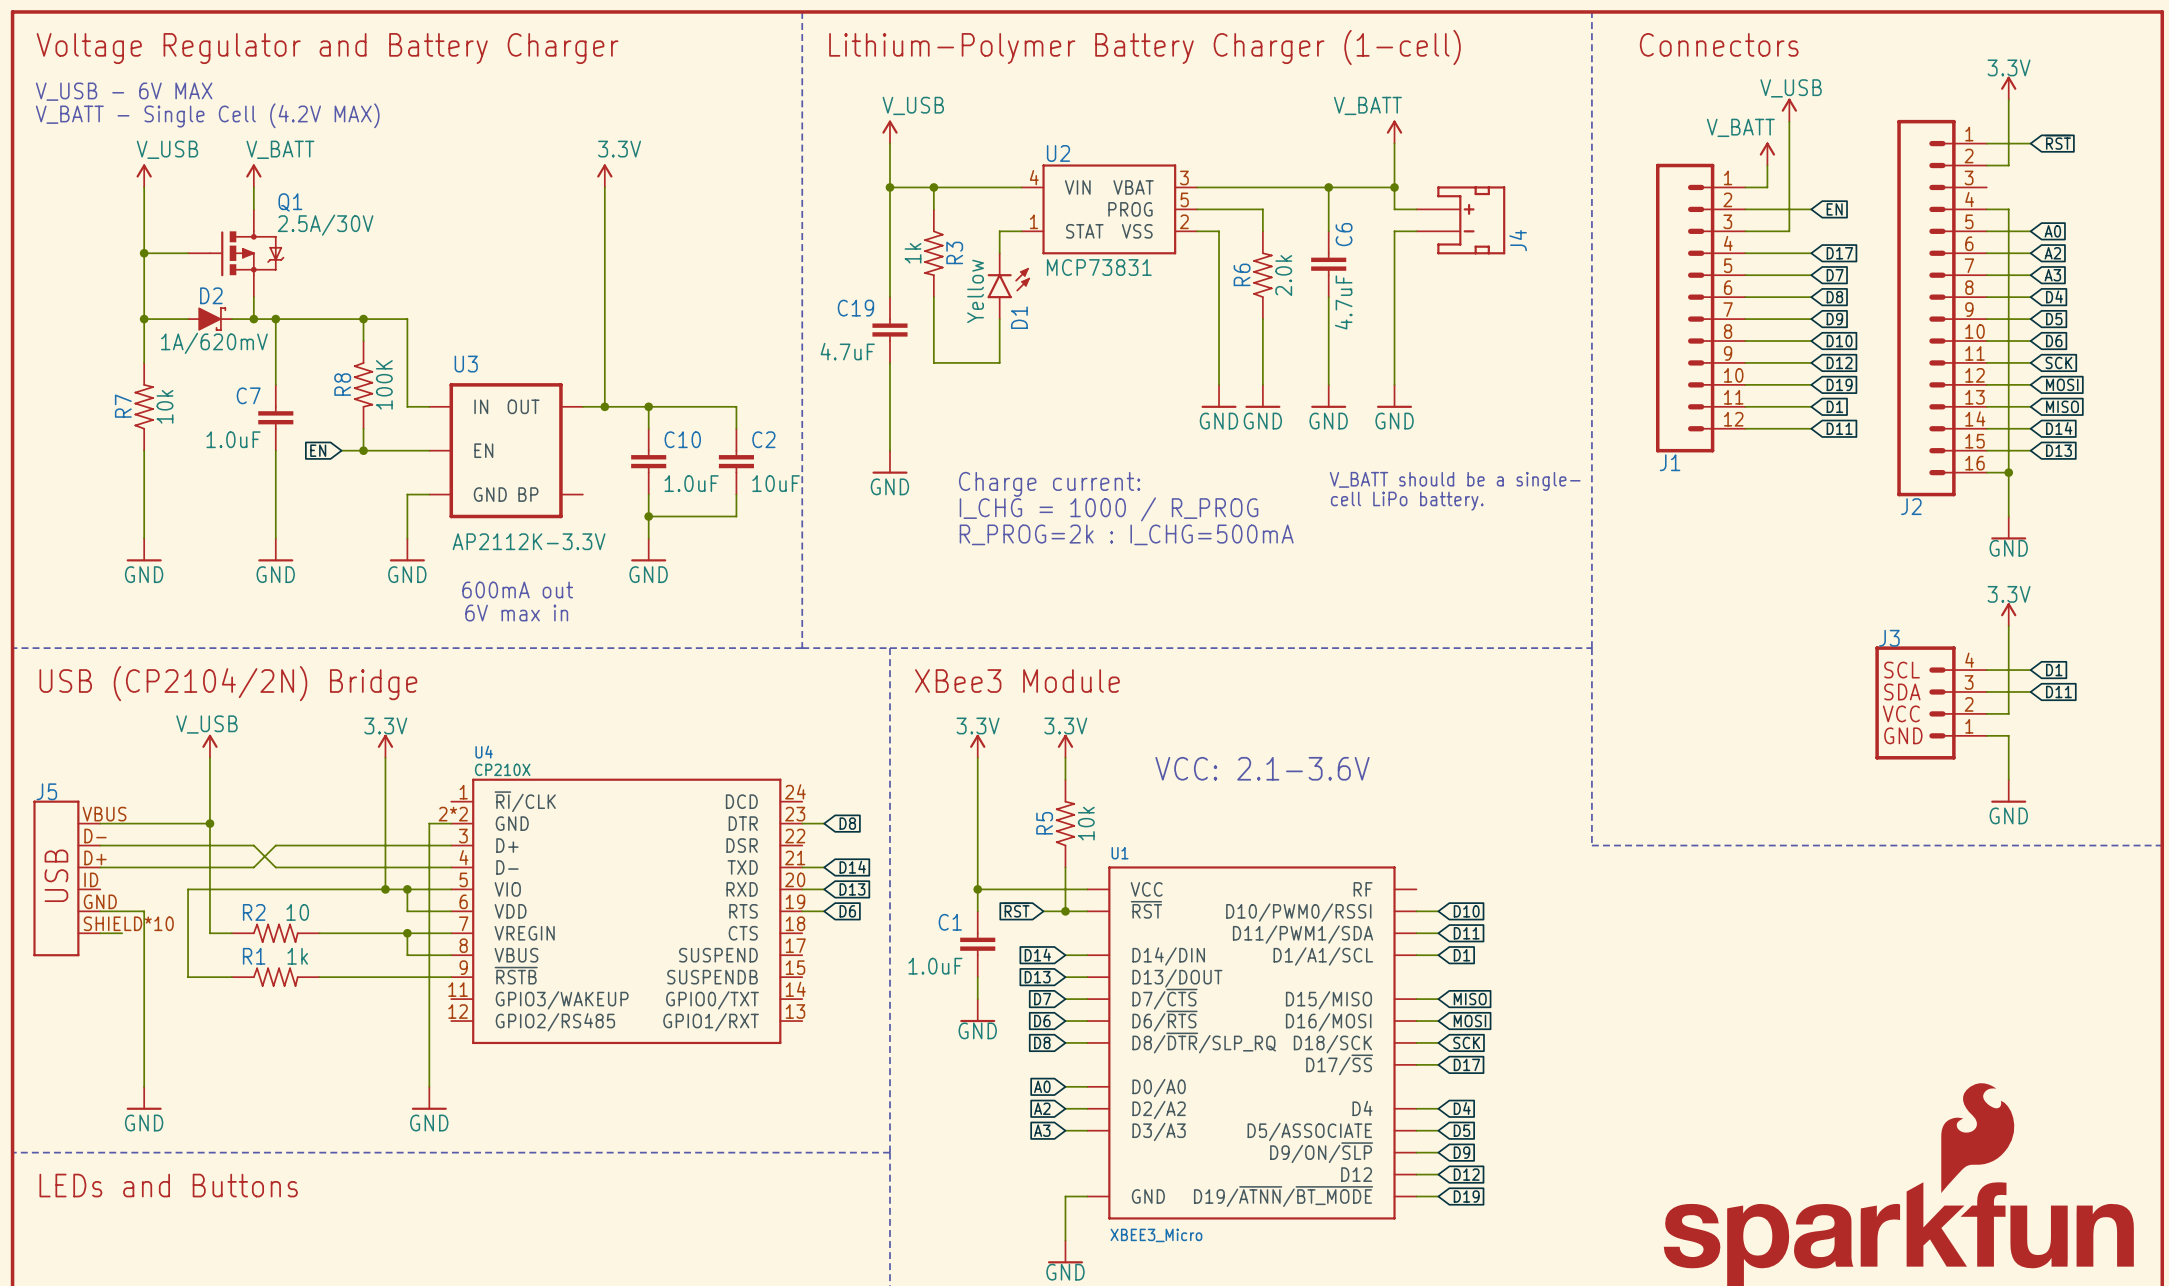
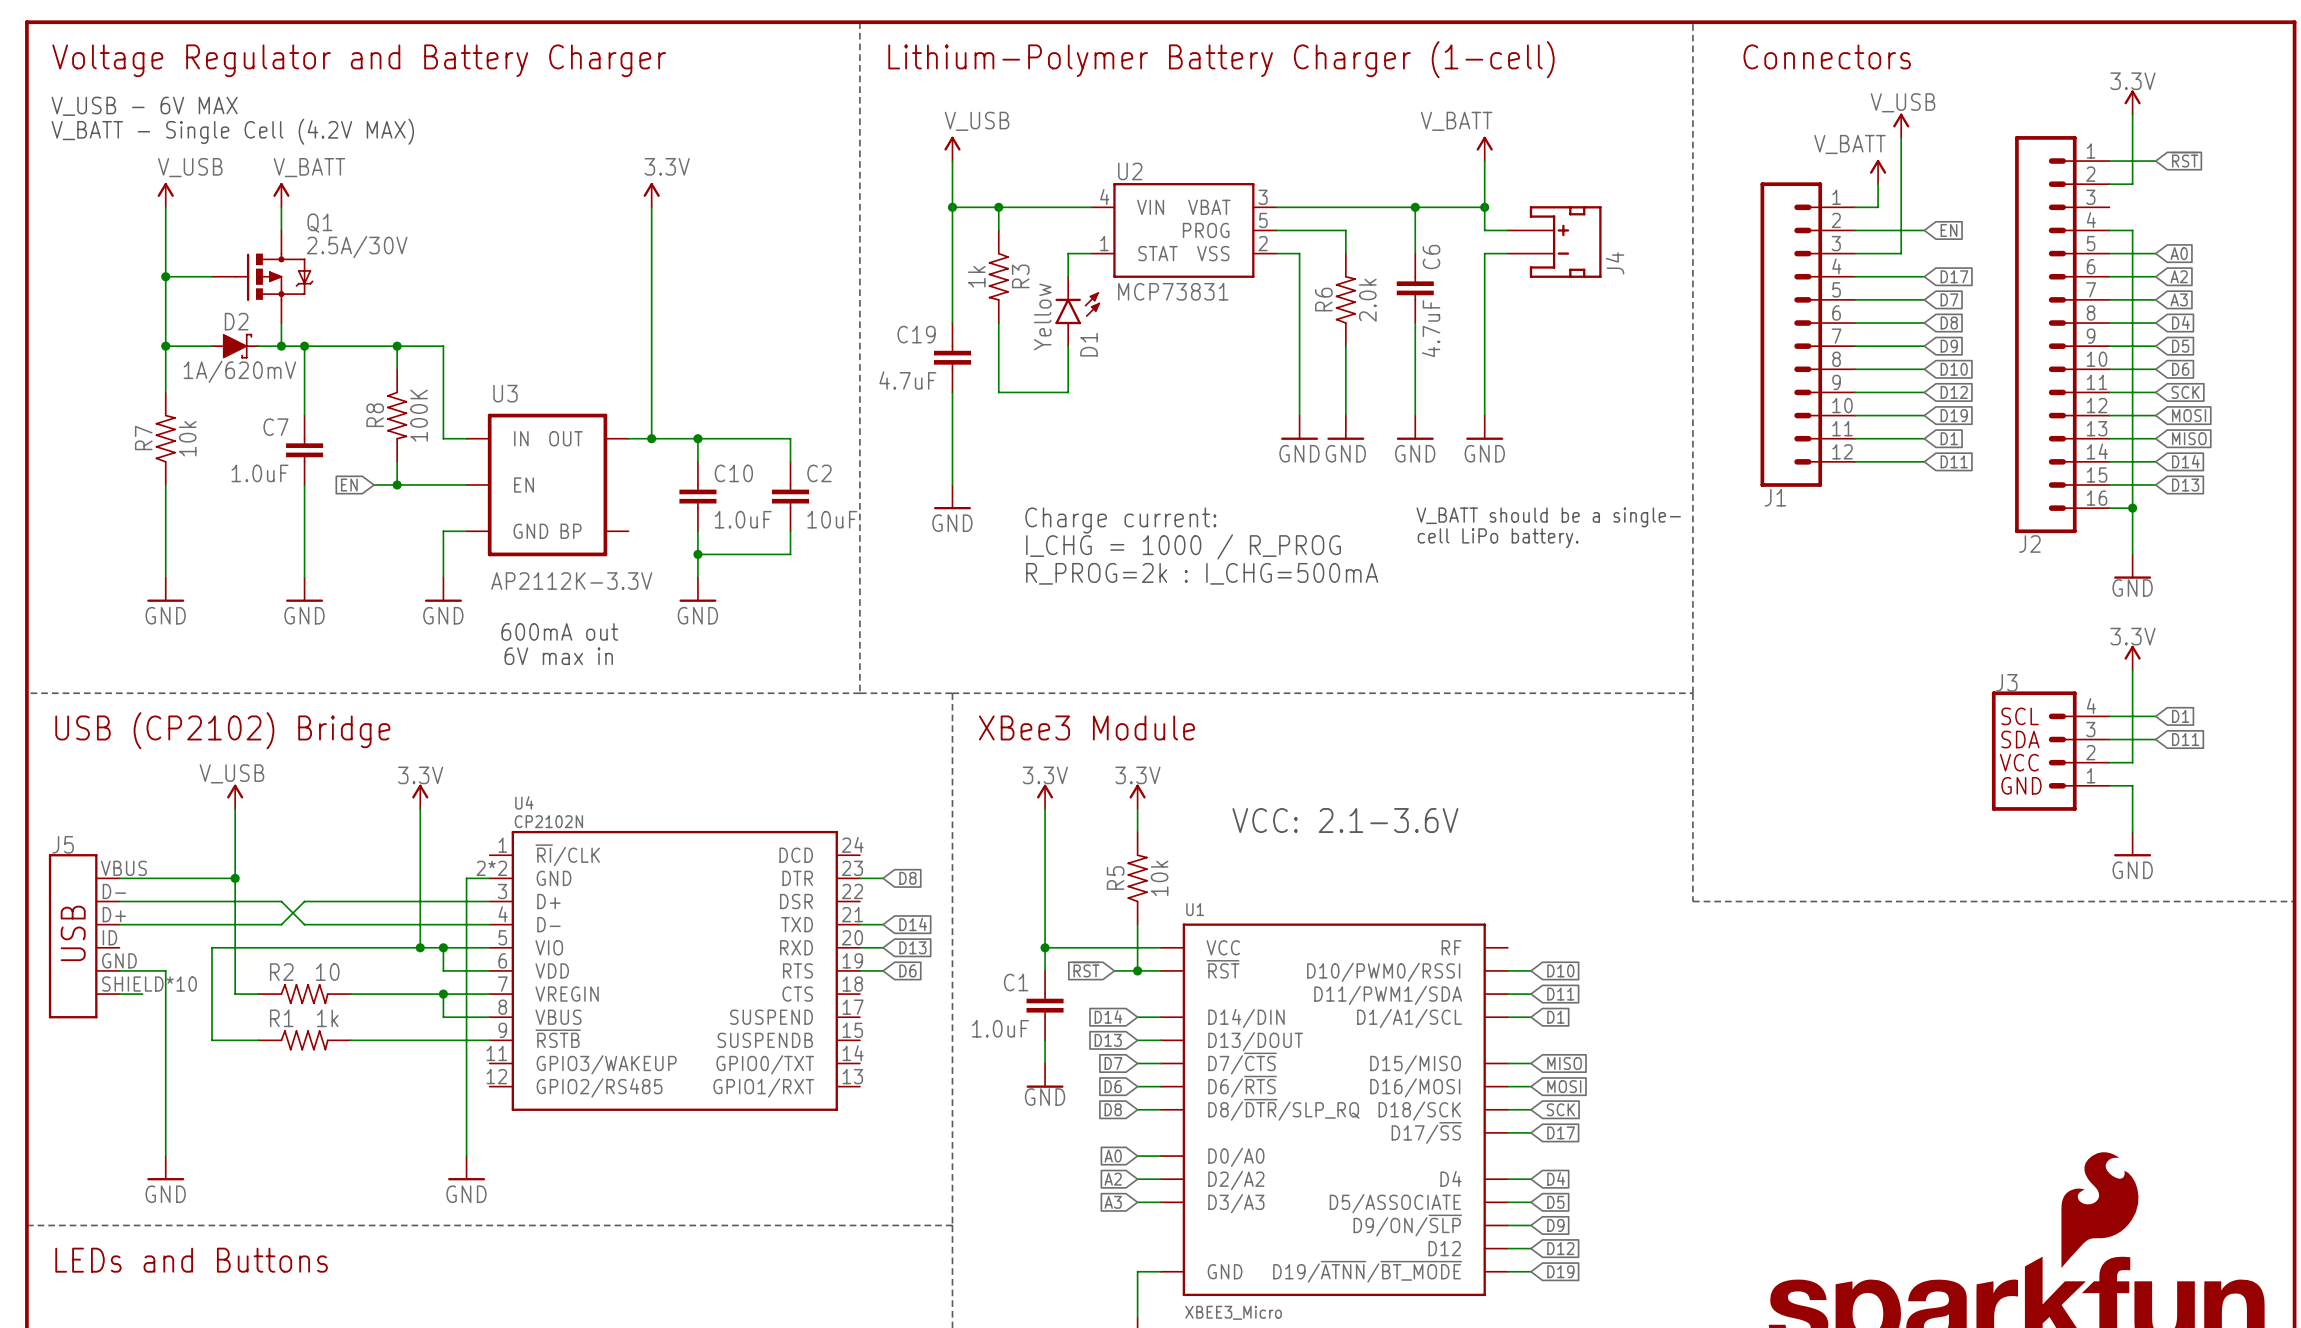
text: USB (CP2104/2N) Bridge (228, 683) -> USB (CP2102) Bridge (222, 730)
U4 value: CP210X (502, 769) -> CP2102N (548, 821)

